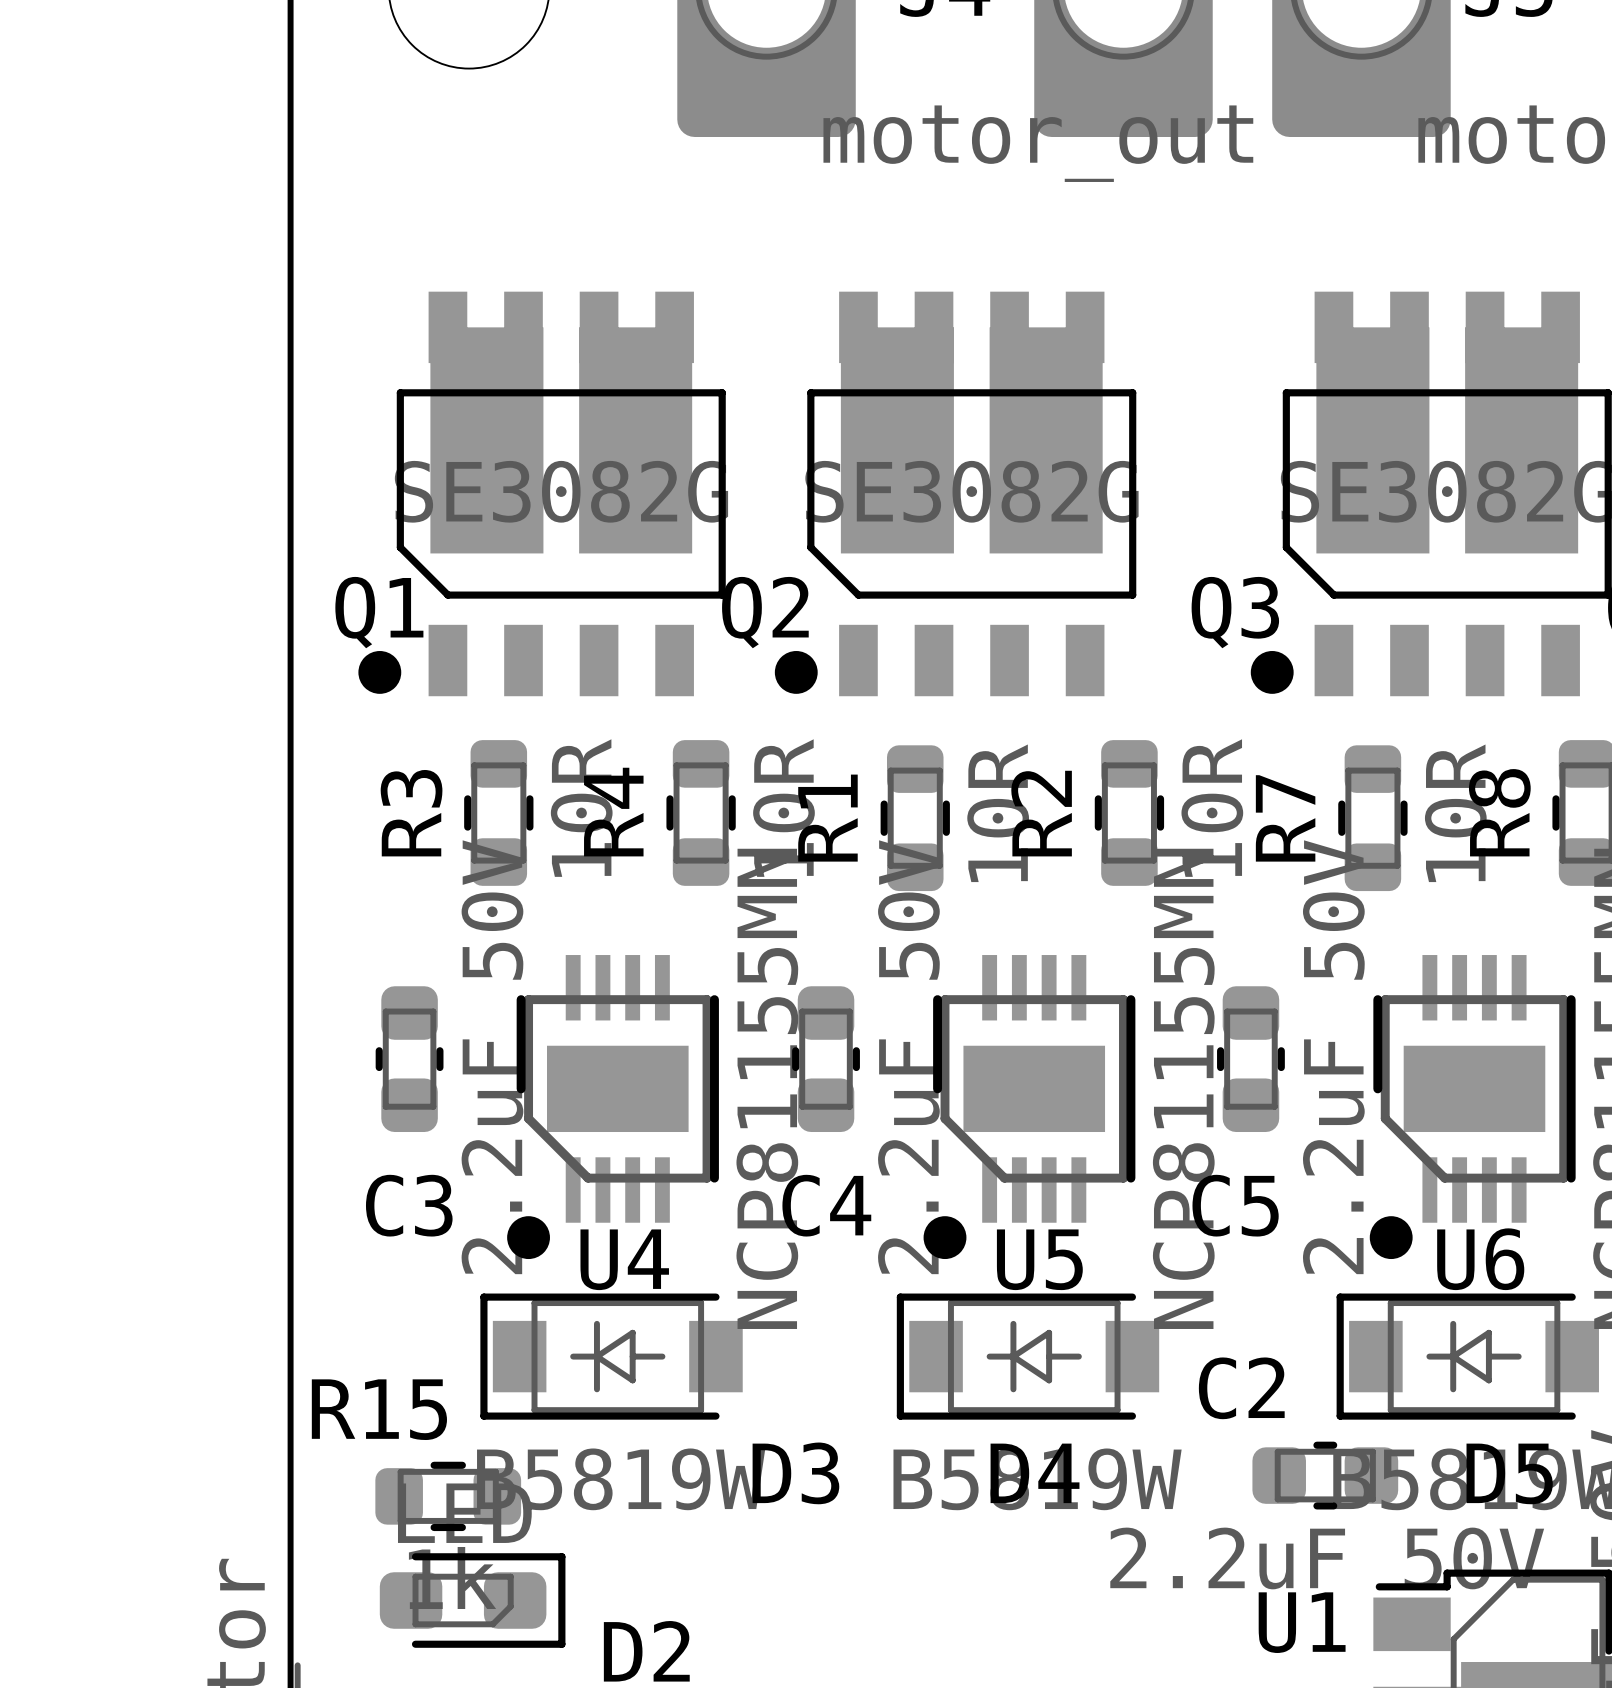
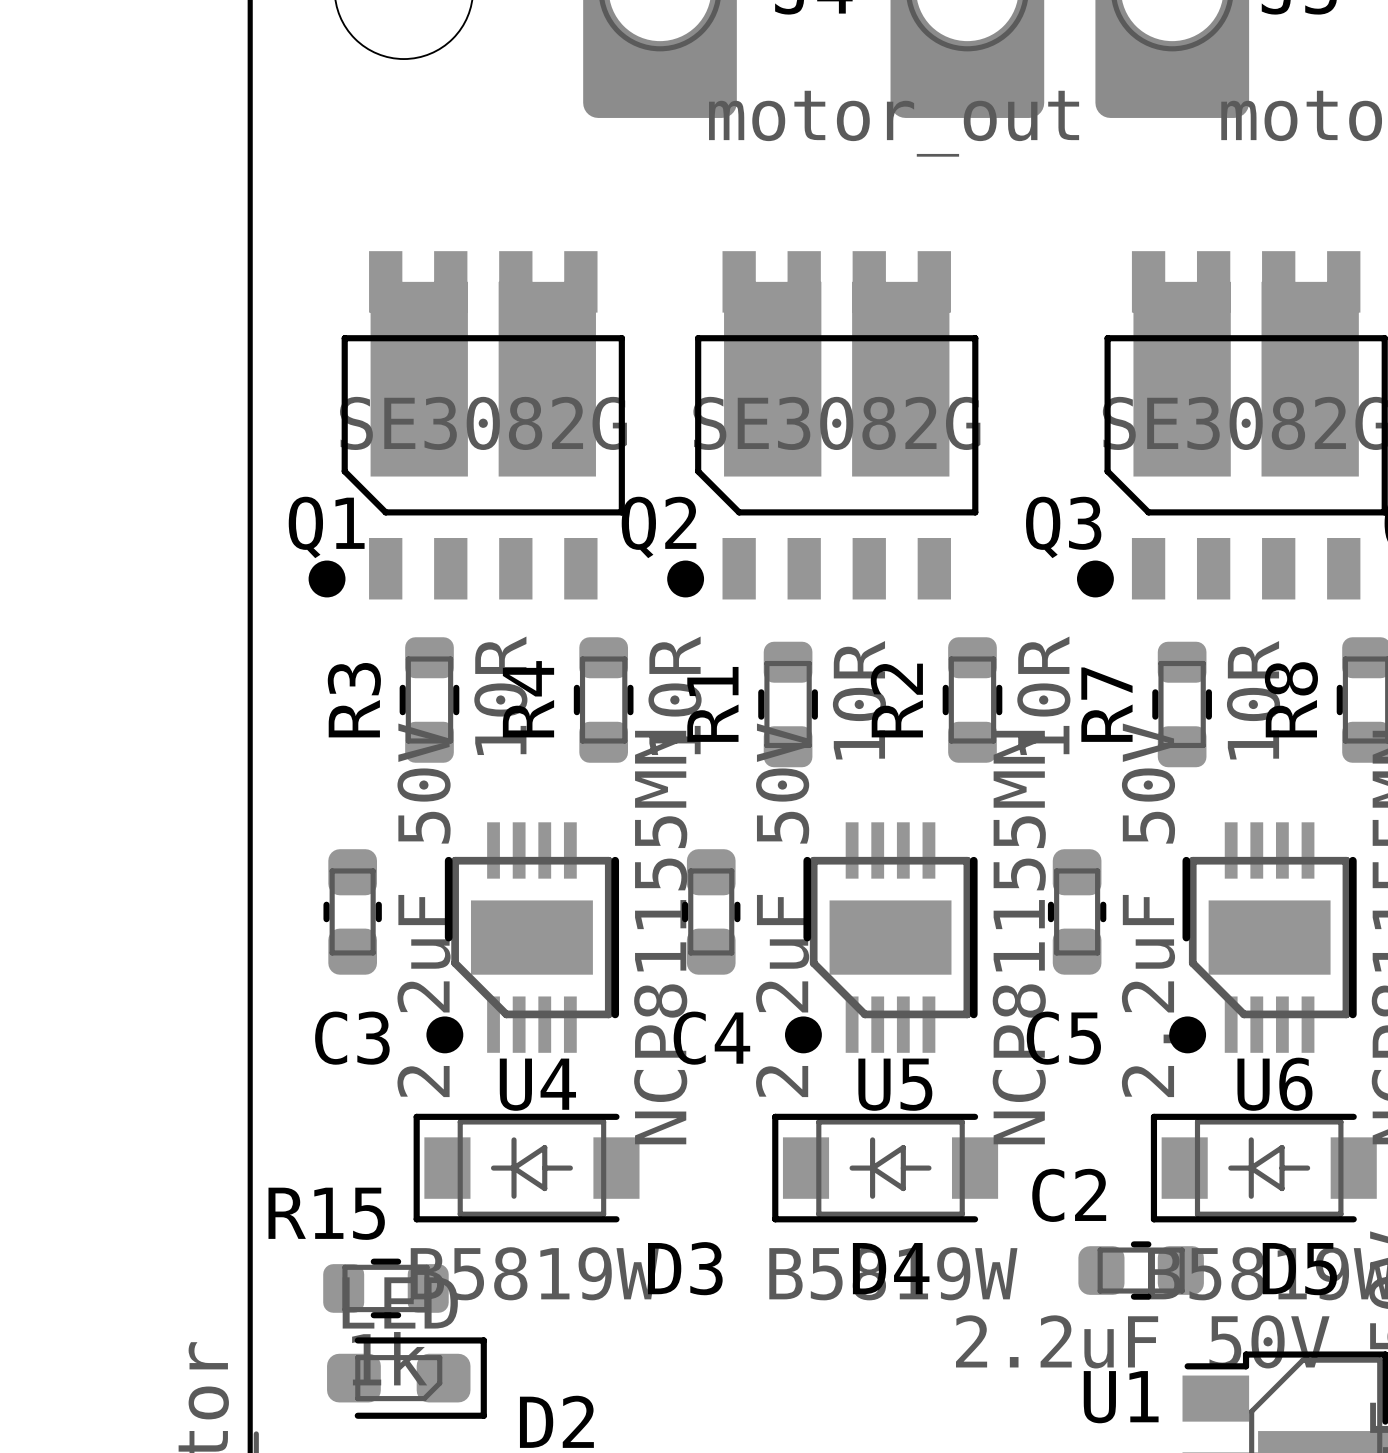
drawing position: (528, 1237) -> (444, 1034)
drawing position: (945, 1237) -> (803, 1034)
drawing position: (1391, 1237) -> (1187, 1034)

